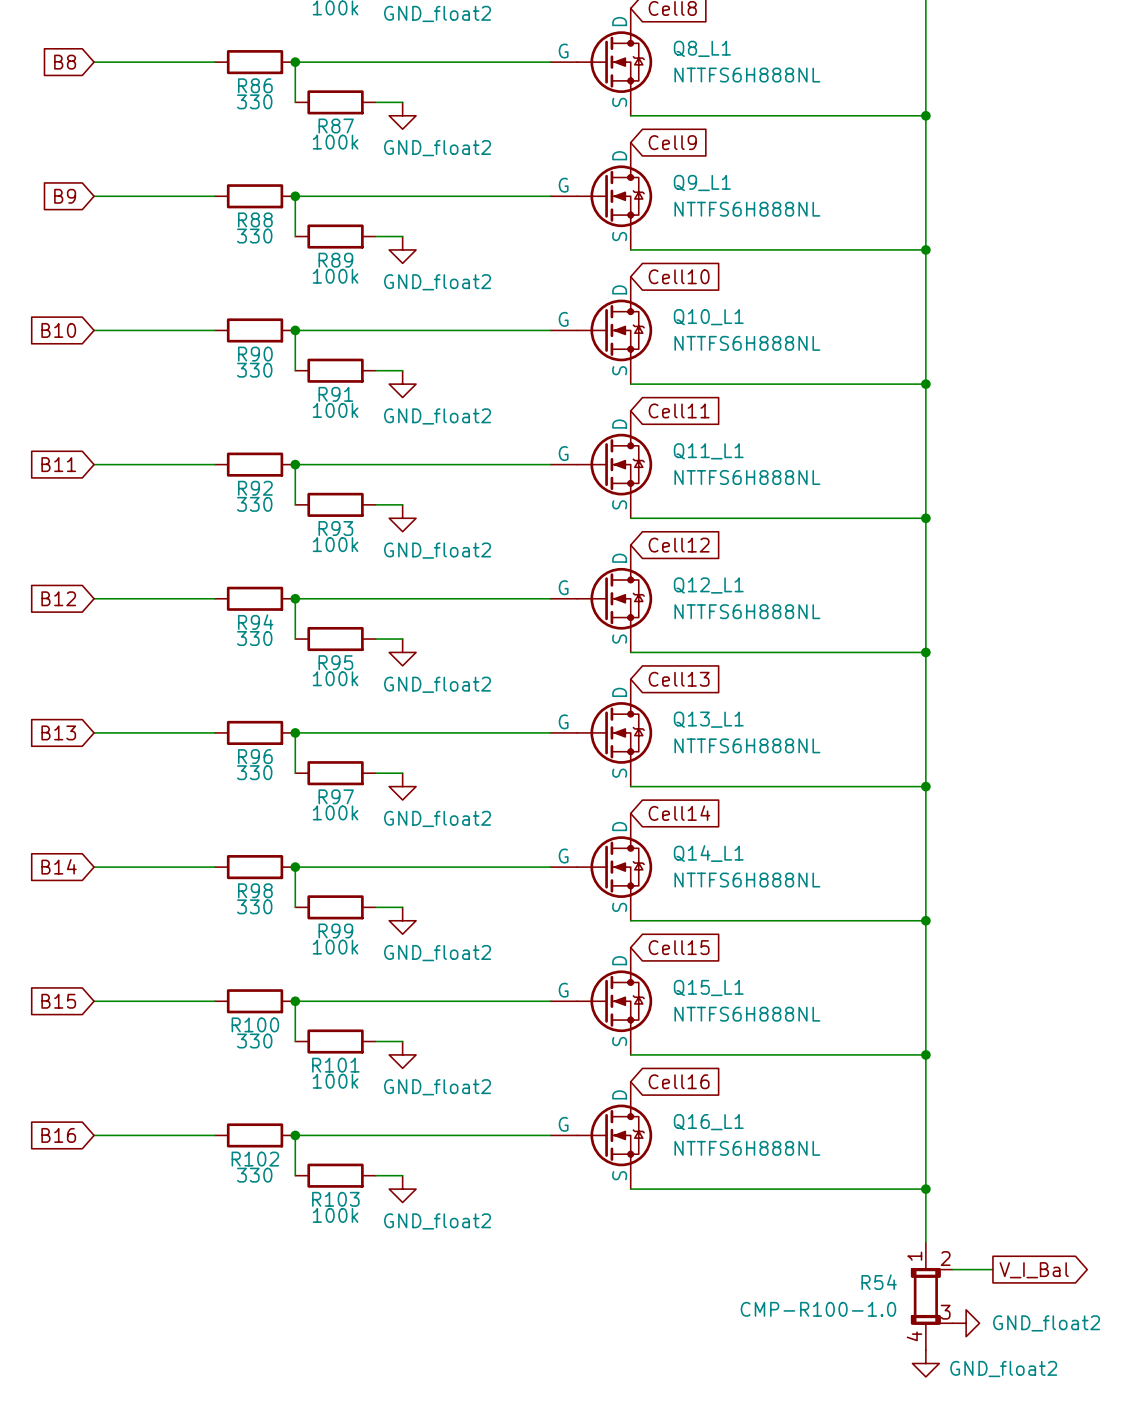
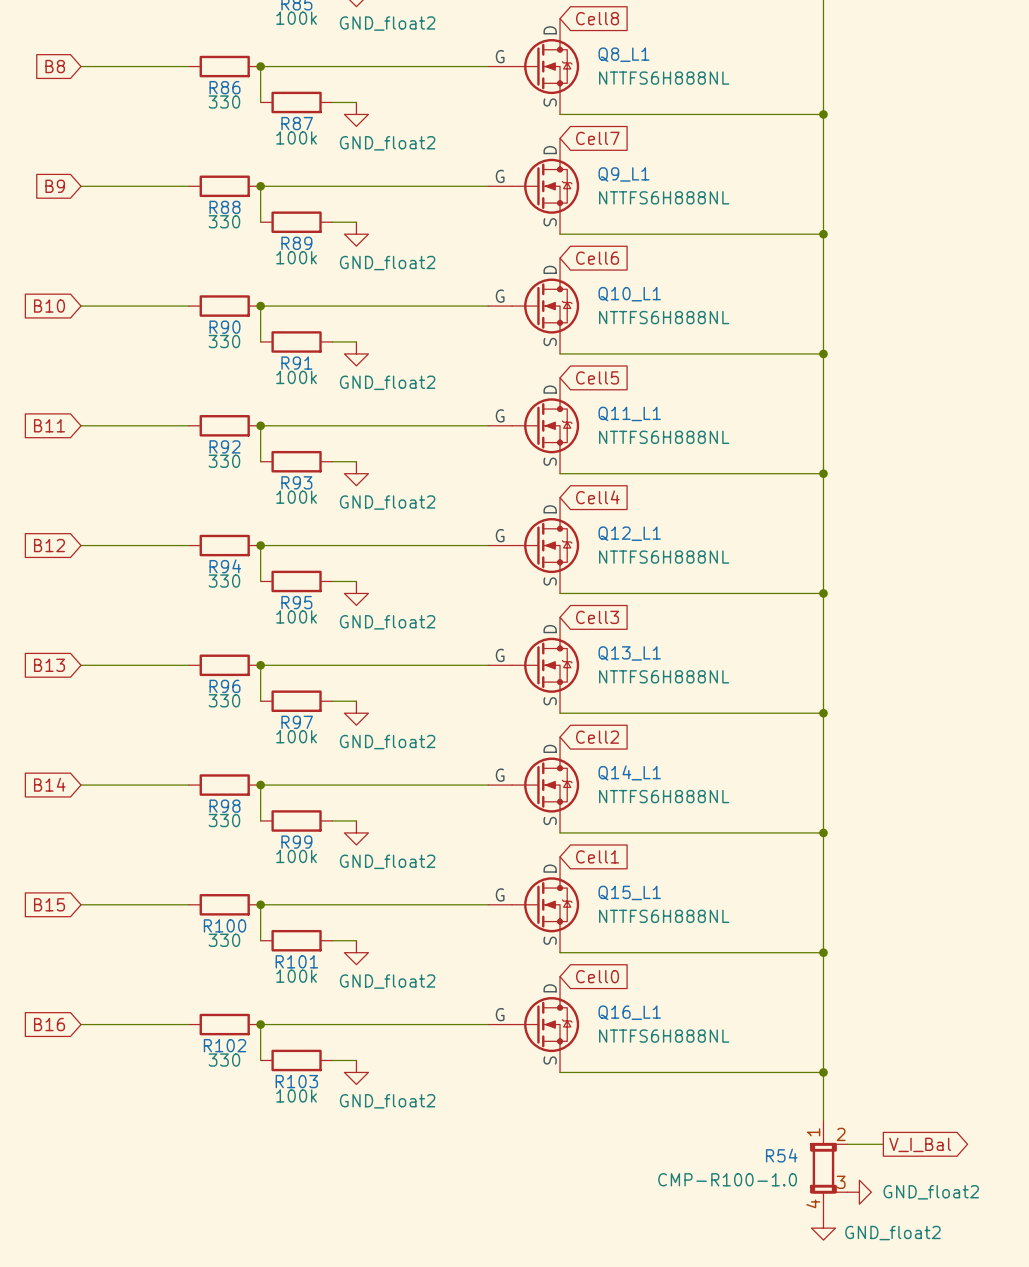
global label: Cell9 (672, 142) -> Cell7 (597, 138)
global label: Cell10 (679, 276) -> Cell6 (597, 258)
global label: Cell11 (679, 410) -> Cell5 (597, 377)
global label: Cell12 (679, 545) -> Cell4 (597, 497)
global label: Cell13 (679, 679) -> Cell3 (597, 617)
global label: Cell14 (679, 813) -> Cell2 (597, 737)
global label: Cell15 (679, 947) -> Cell1 (597, 856)
global label: Cell16 (679, 1081) -> Cell0 (597, 976)

